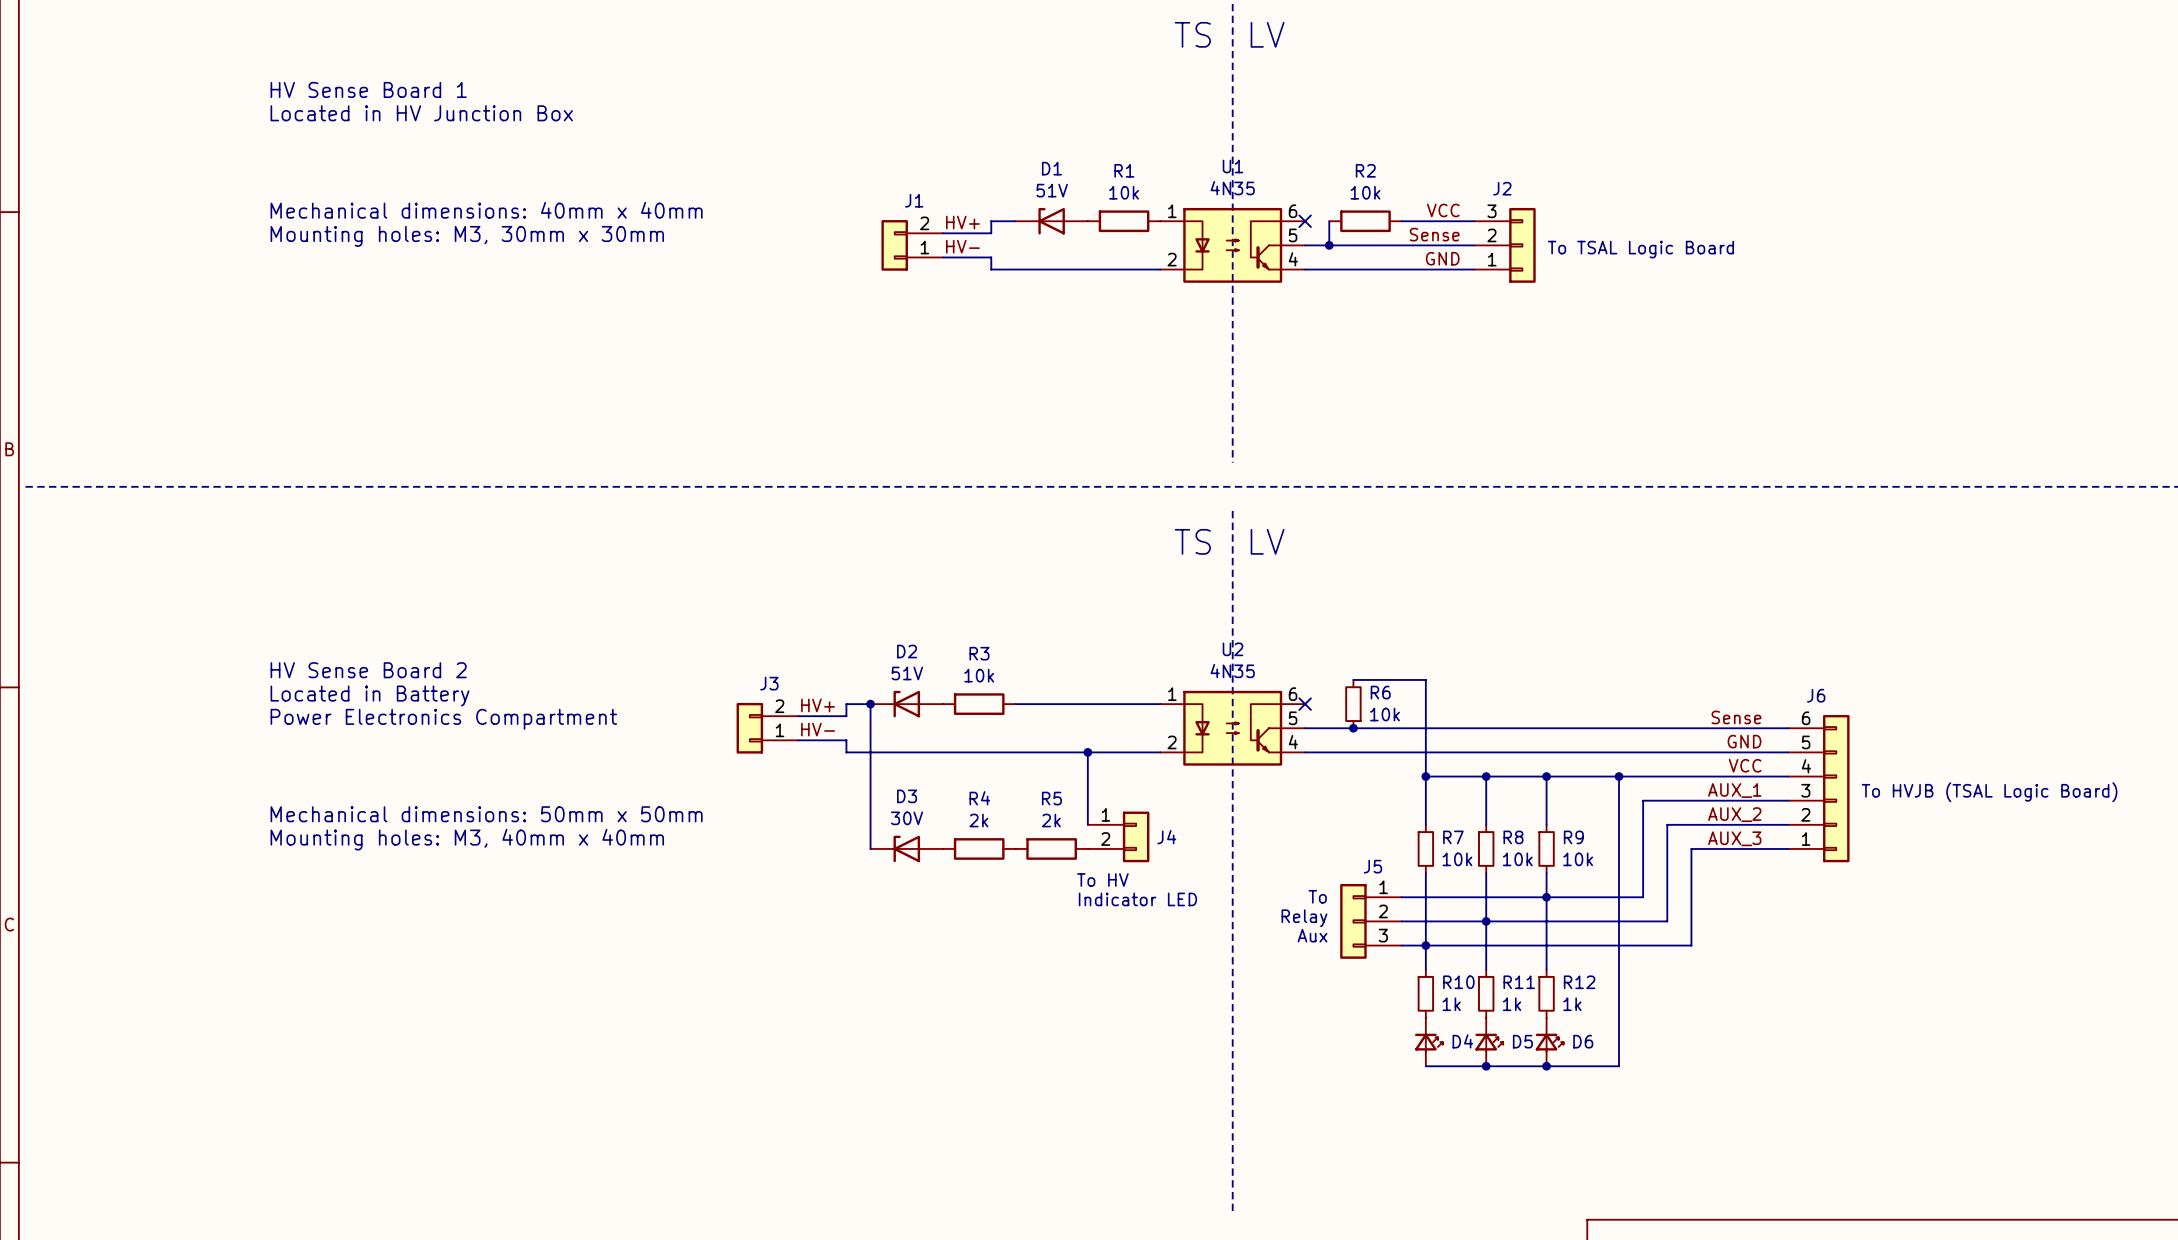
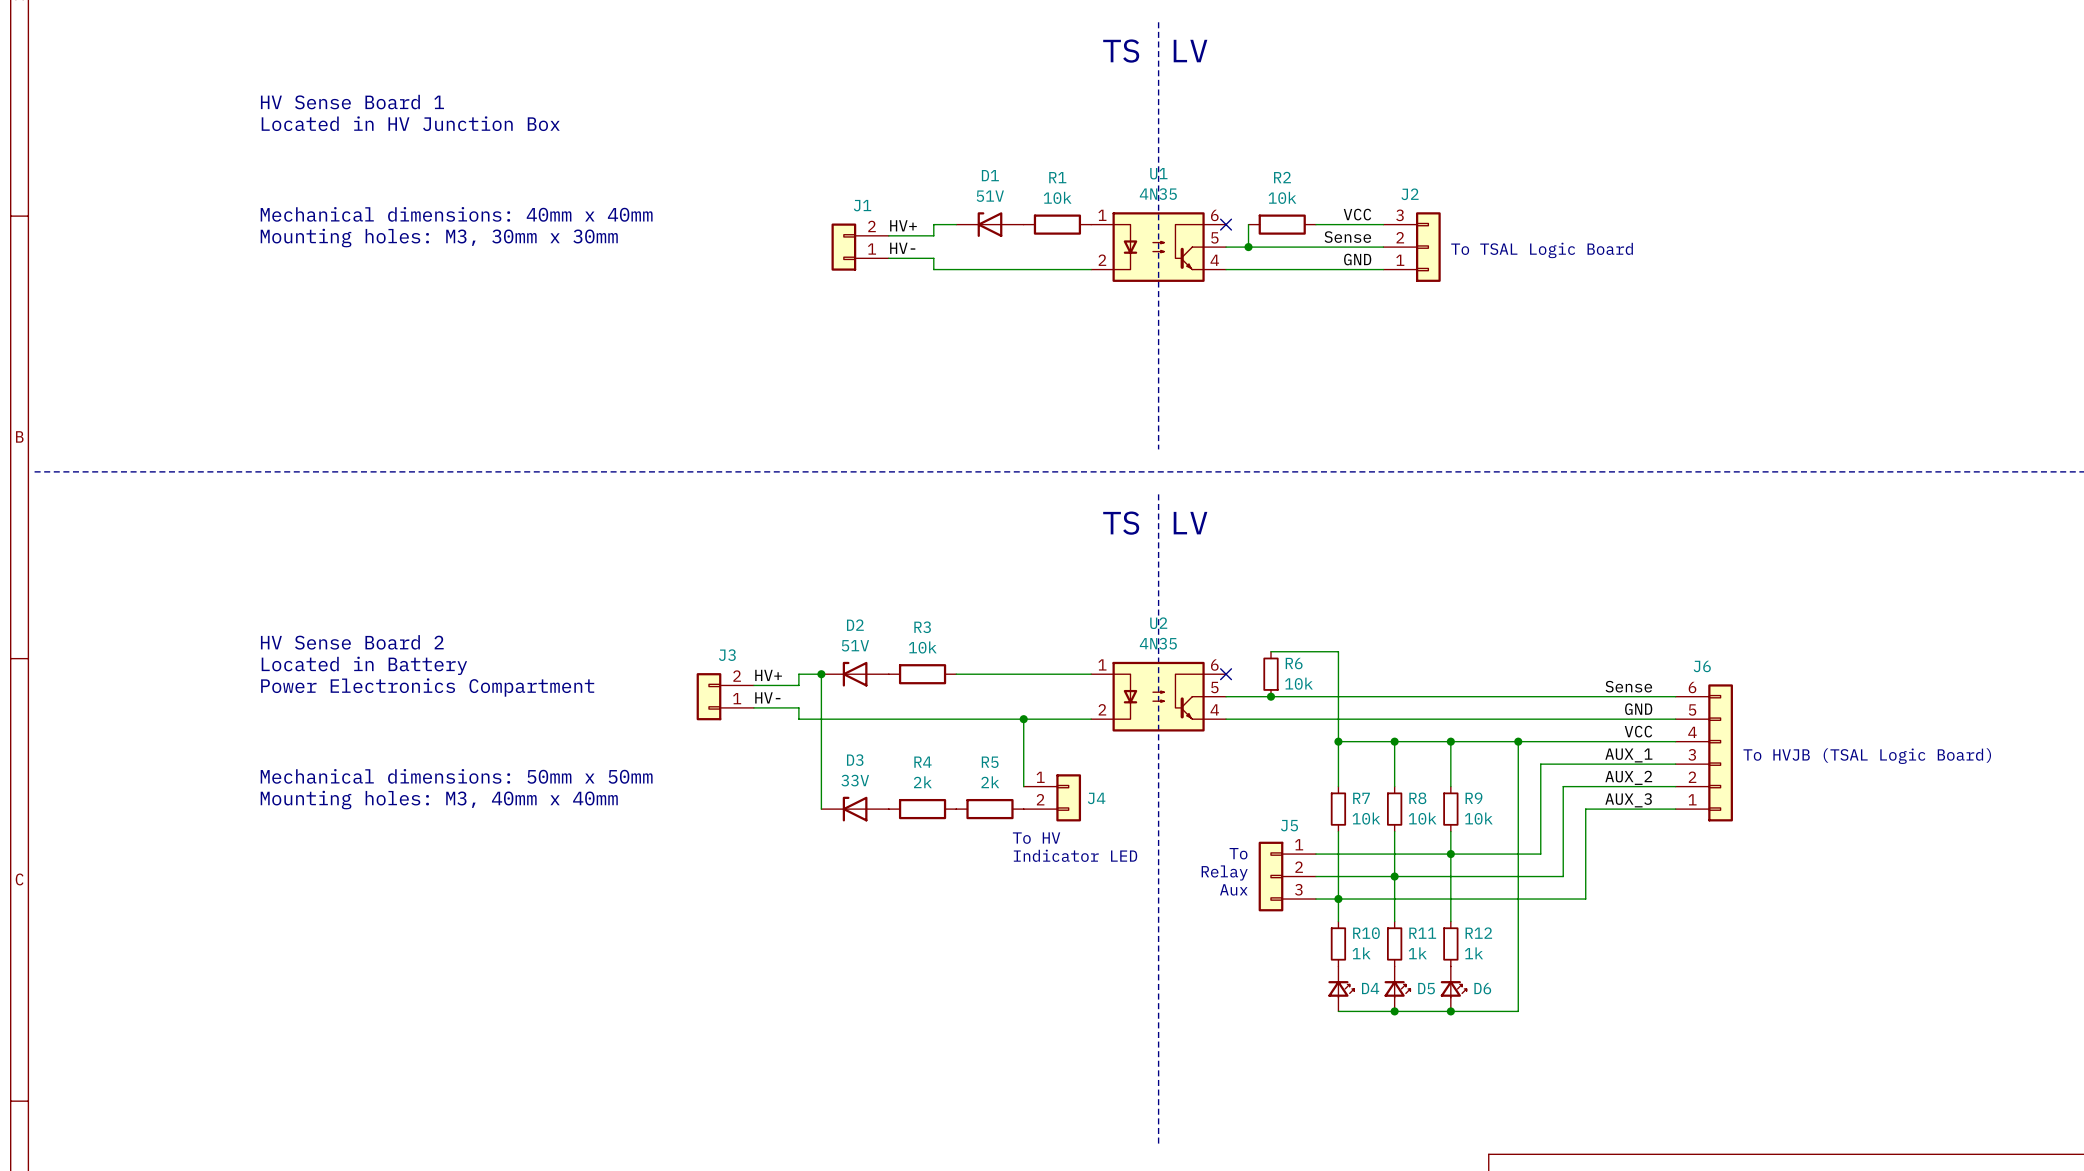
D3 value: 30V (907, 818) -> 33V (855, 780)

